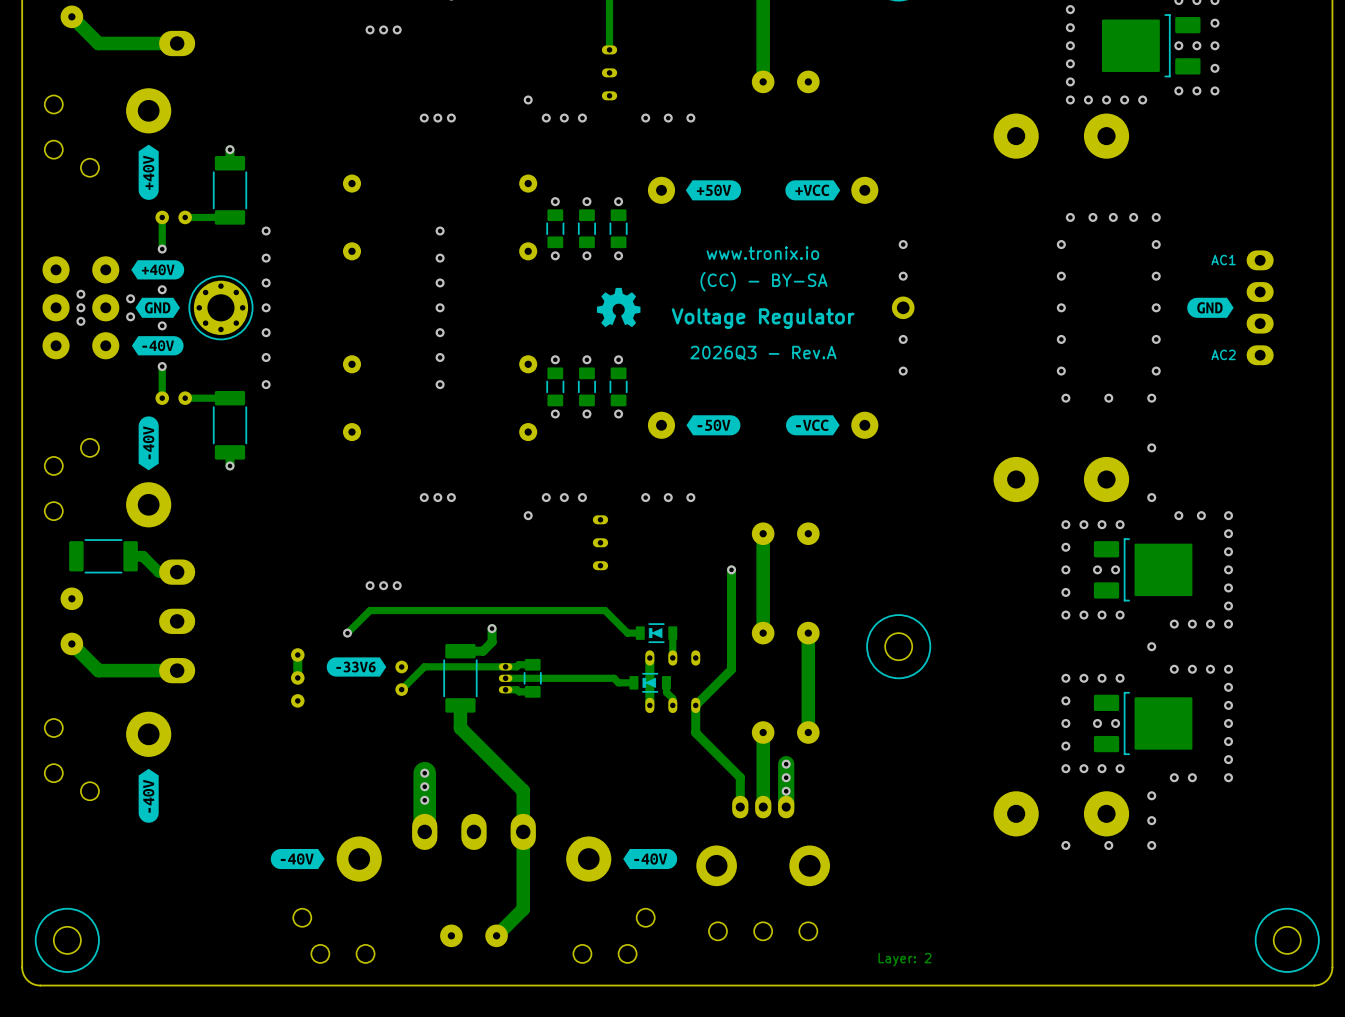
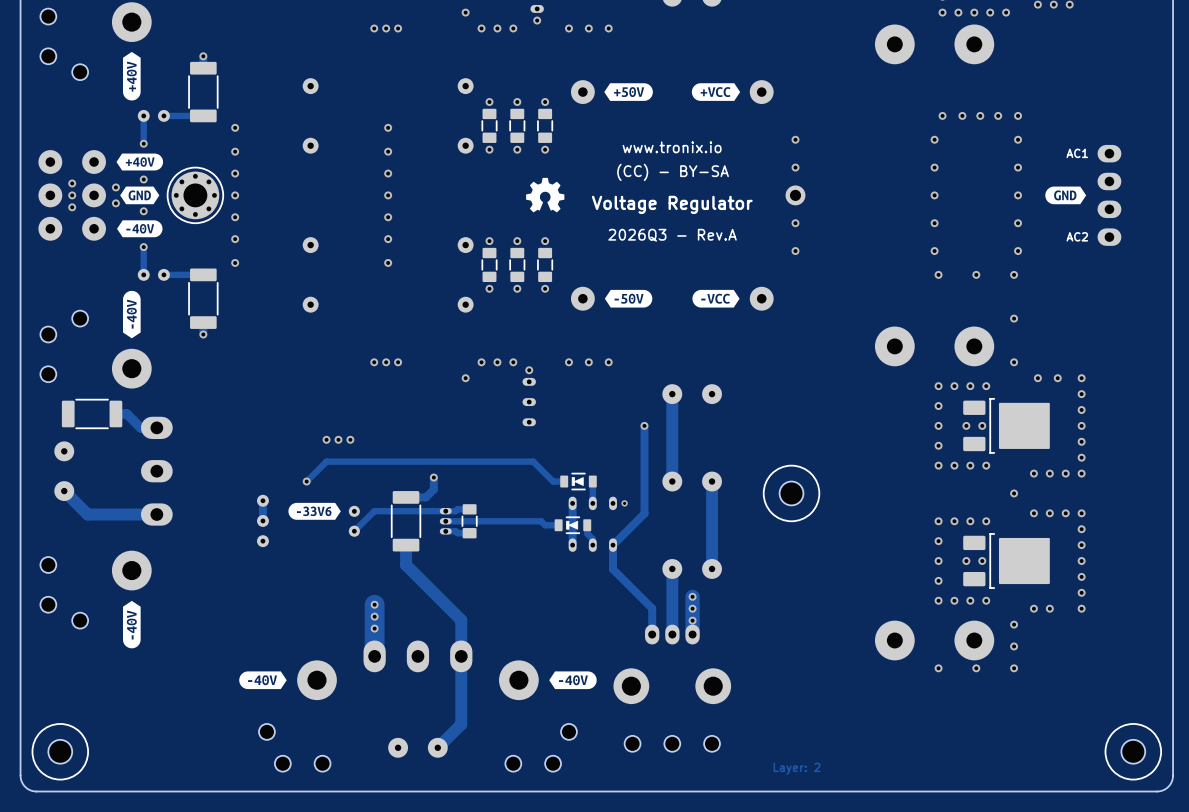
via: none -> (537, 20)
via: none -> (529, 370)
via: none -> (624, 503)

